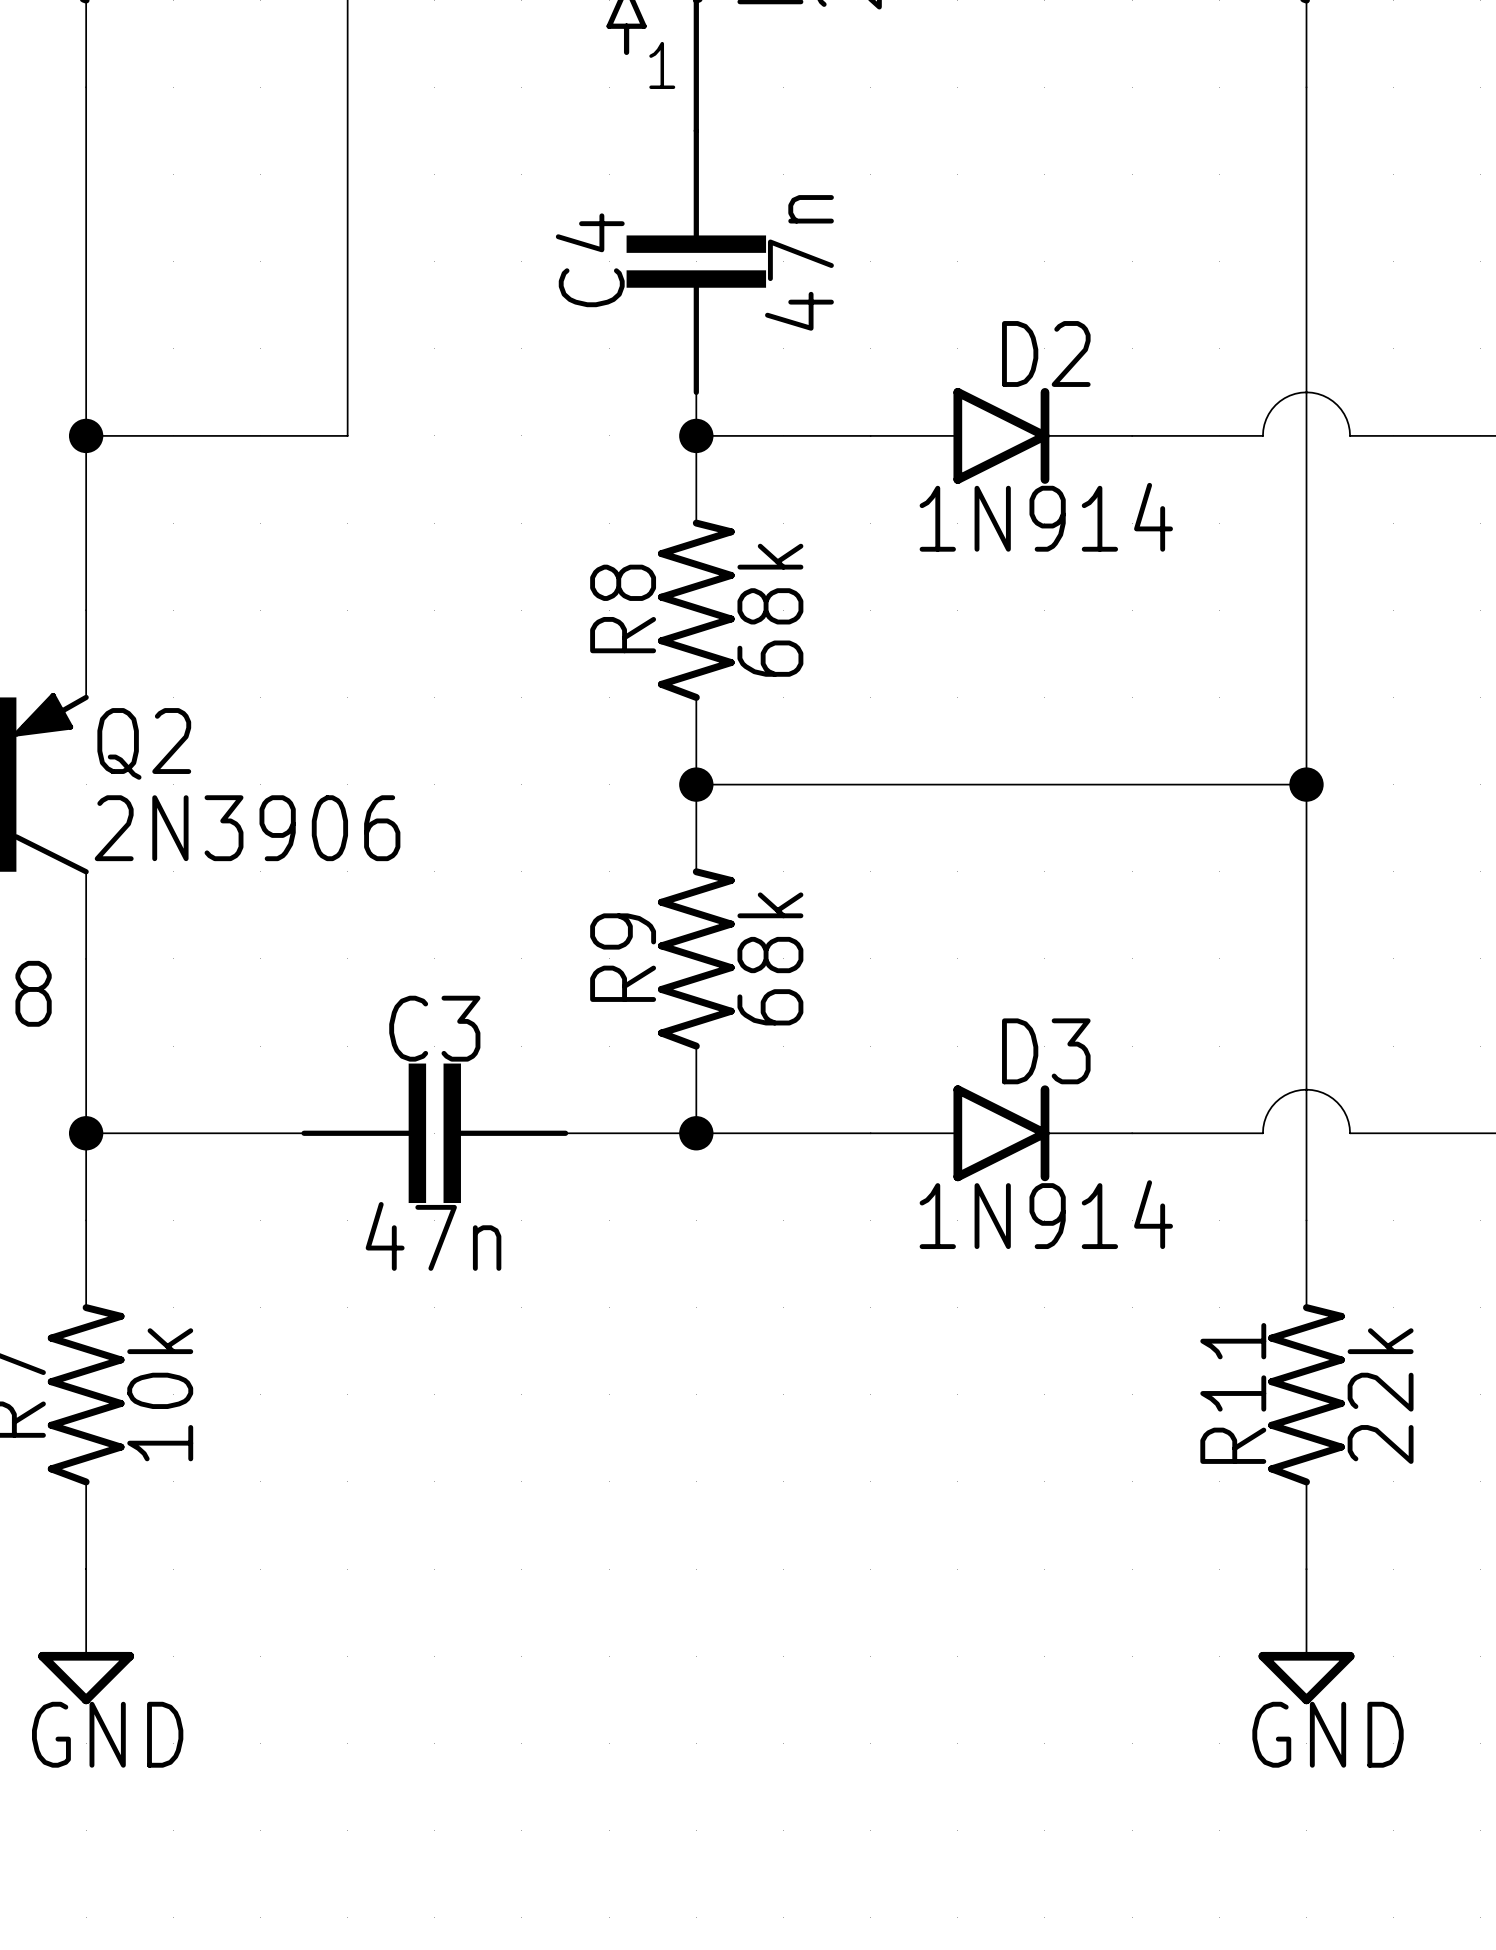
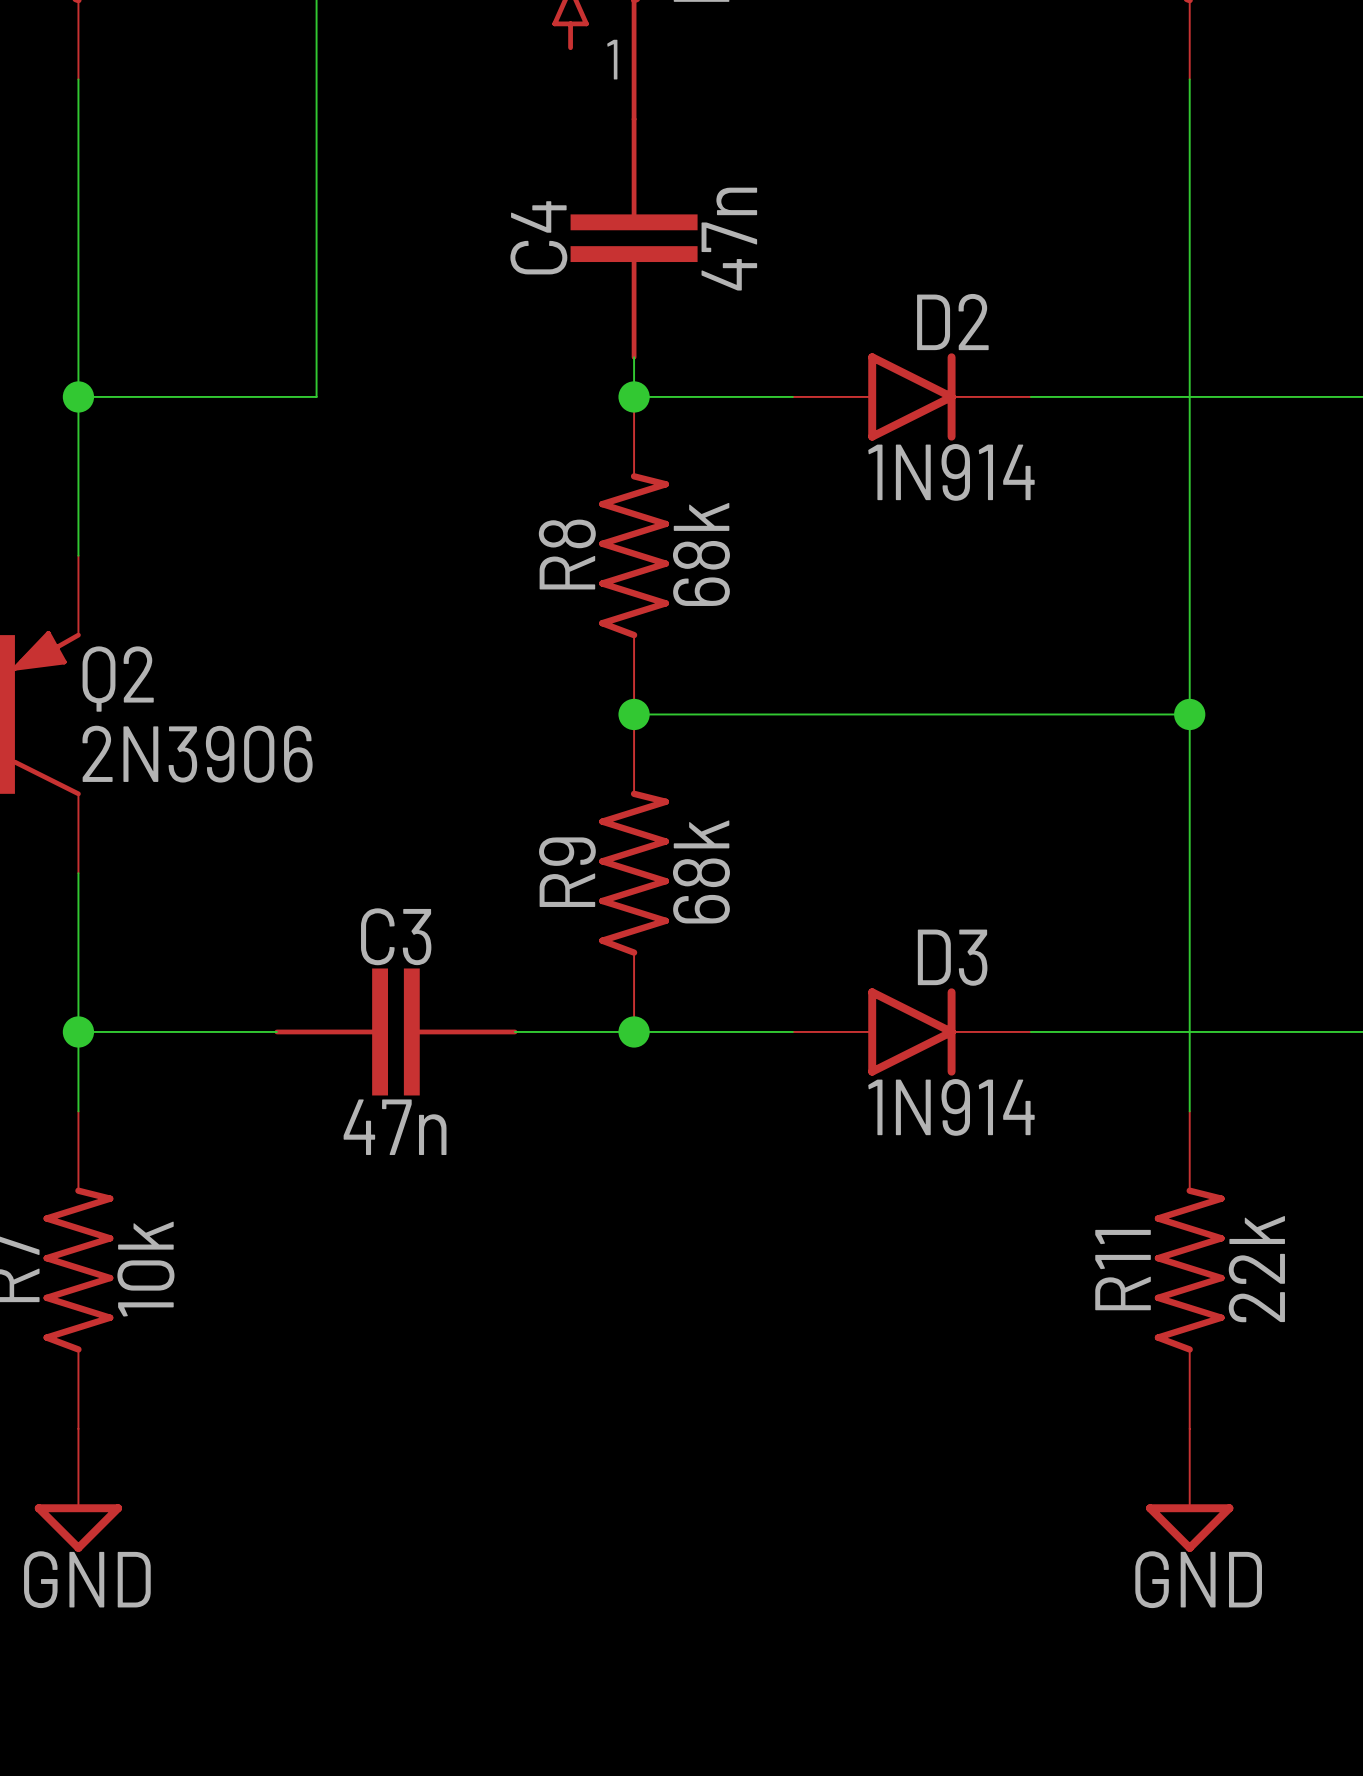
wire: (1262, 435) (1266, 419) (1275, 405) (1289, 395) (1306, 392) (1323, 395) (1337, 405) (1346, 419) (1350, 435) -> (1150, 396) (1229, 396)
wire: (1262, 1133) (1266, 1116) (1275, 1102) (1289, 1093) (1306, 1089) (1323, 1093) (1337, 1102) (1346, 1116) (1350, 1133) -> (1150, 1031) (1229, 1031)

